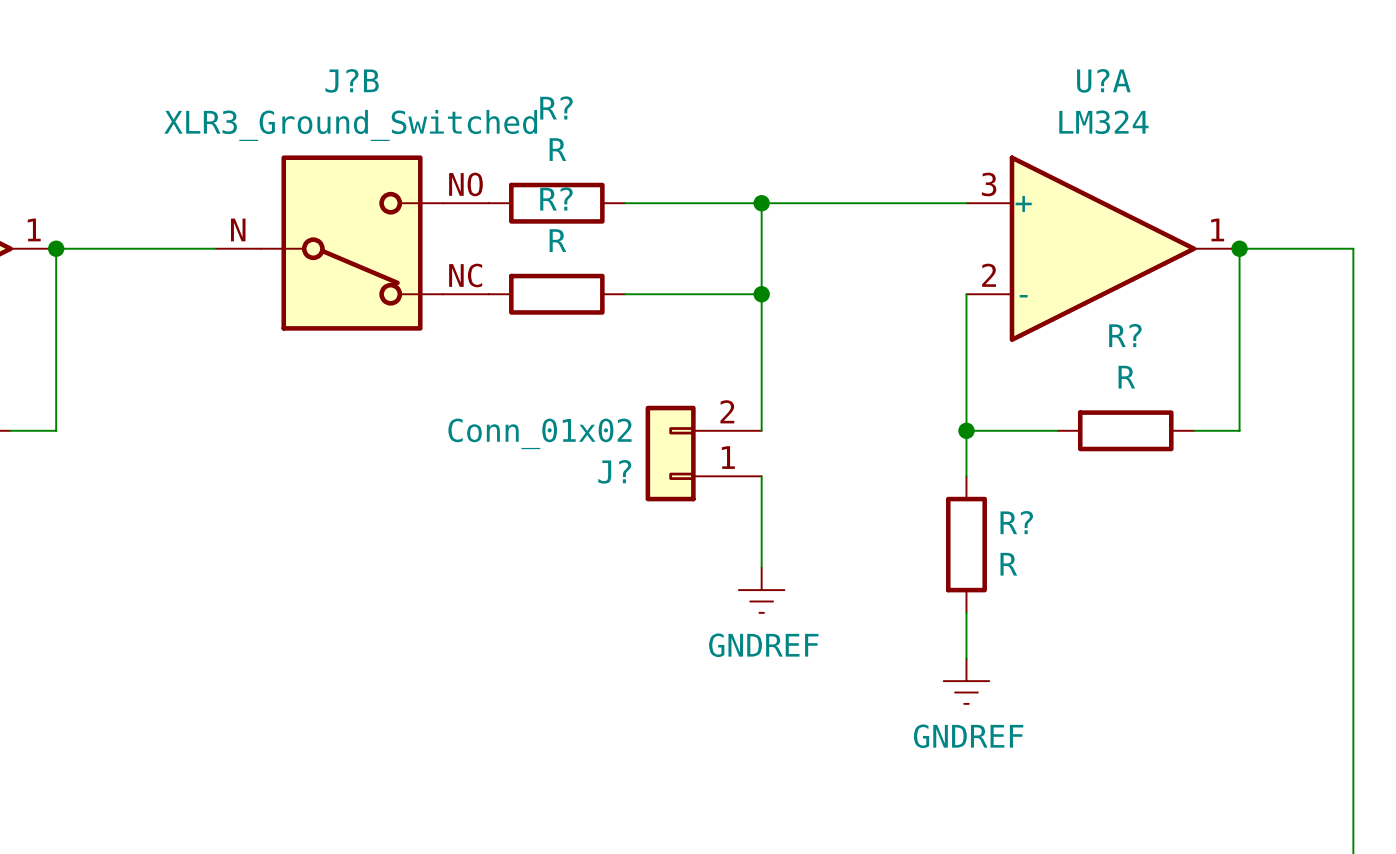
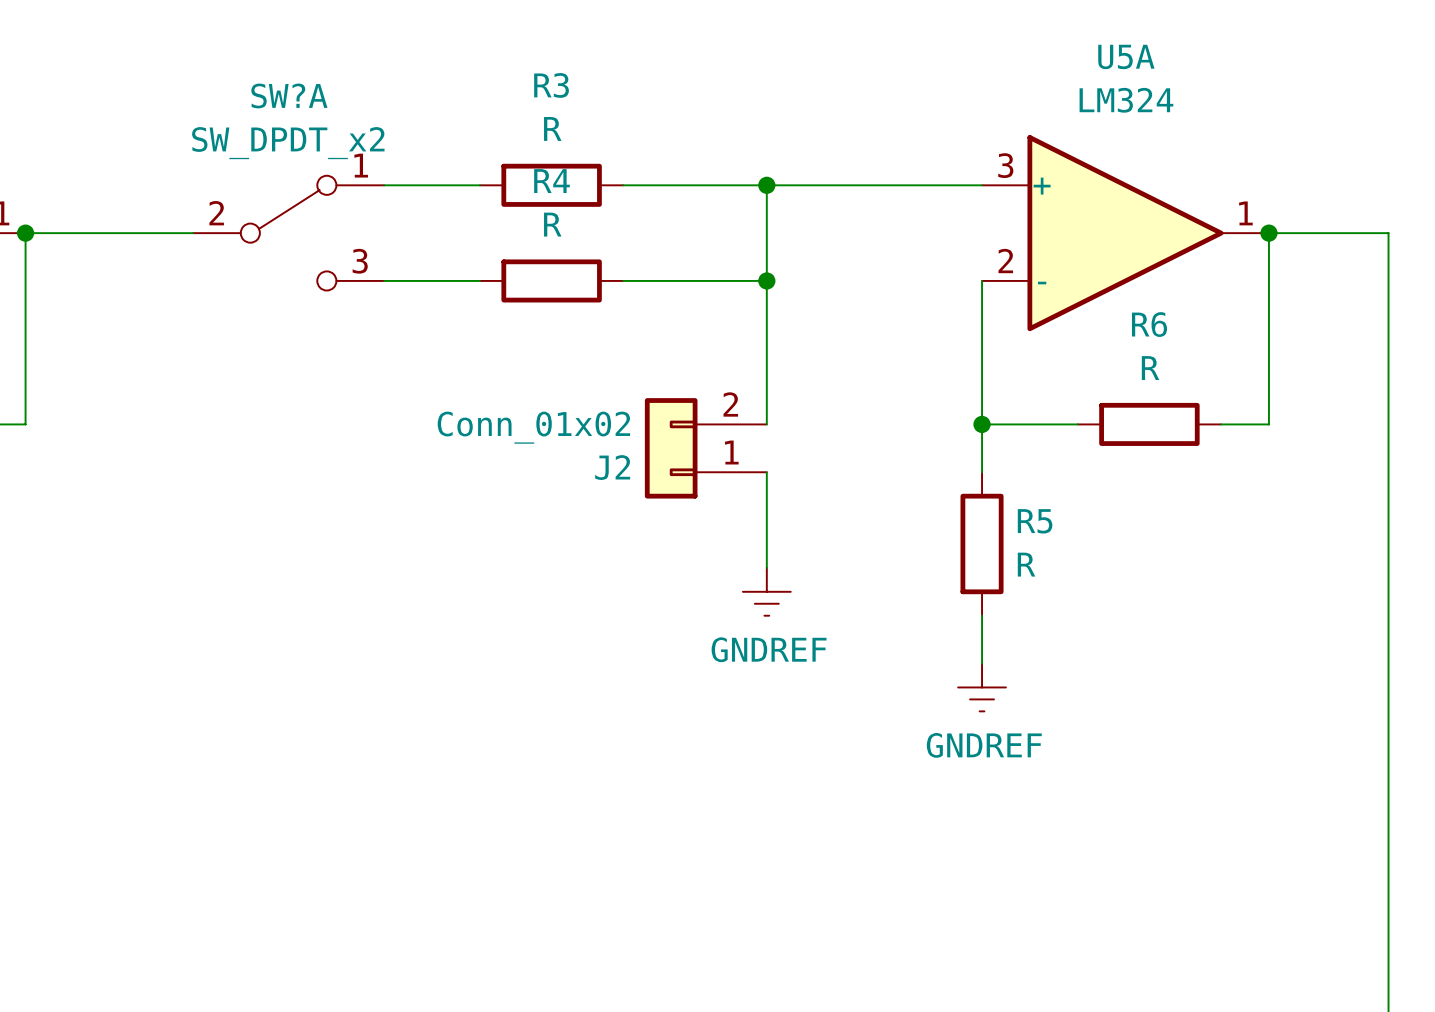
U?A name: U?A (1103, 80) -> U5A (1126, 56)
R? name: R? (556, 107) -> R3 (551, 85)
R? name: R? (556, 198) -> R4 (551, 181)
J?B: XLR3_Ground_Switched (352, 243) -> none
SW?A: none -> SW_DPDT_x2 (288, 233)
R? name: R? (1125, 335) -> R6 (1149, 324)
J? name: J? (614, 471) -> J2 (612, 467)
R? name: R? (1016, 522) -> R5 (1035, 521)

